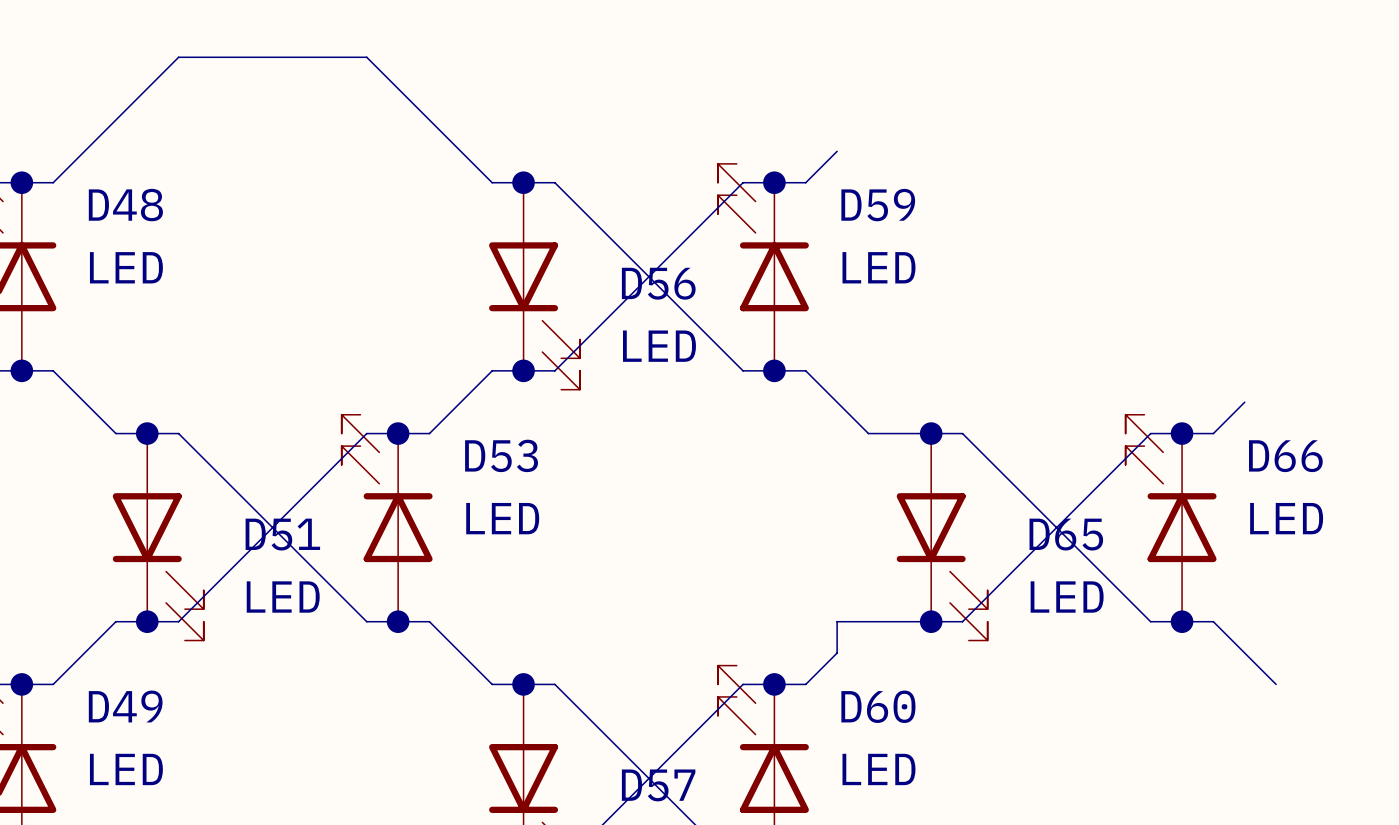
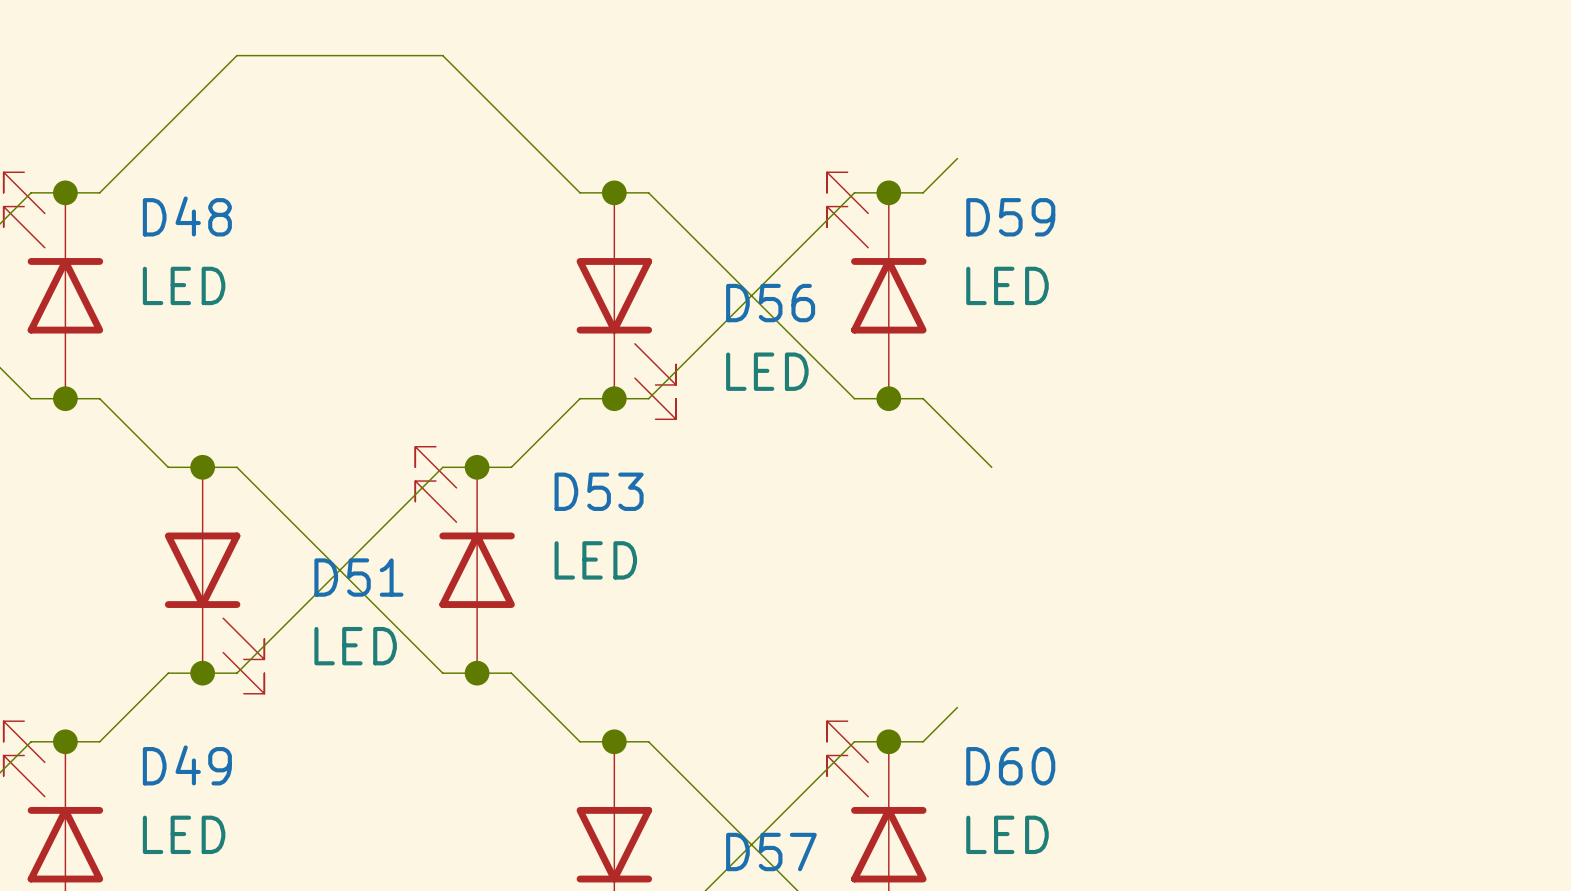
wire: (1244, 402) (1213, 433) (1150, 433) (962, 621) (837, 621) (837, 653) -> none
wire: (868, 433) (962, 433) (1150, 621) (1213, 621) (1276, 684) -> none
junction: (931, 433) -> none
junction: (1182, 433) -> none
D66: LED (1171, 518) -> none
D65: LED (942, 537) -> none
junction: (931, 621) -> none
junction: (1182, 621) -> none

